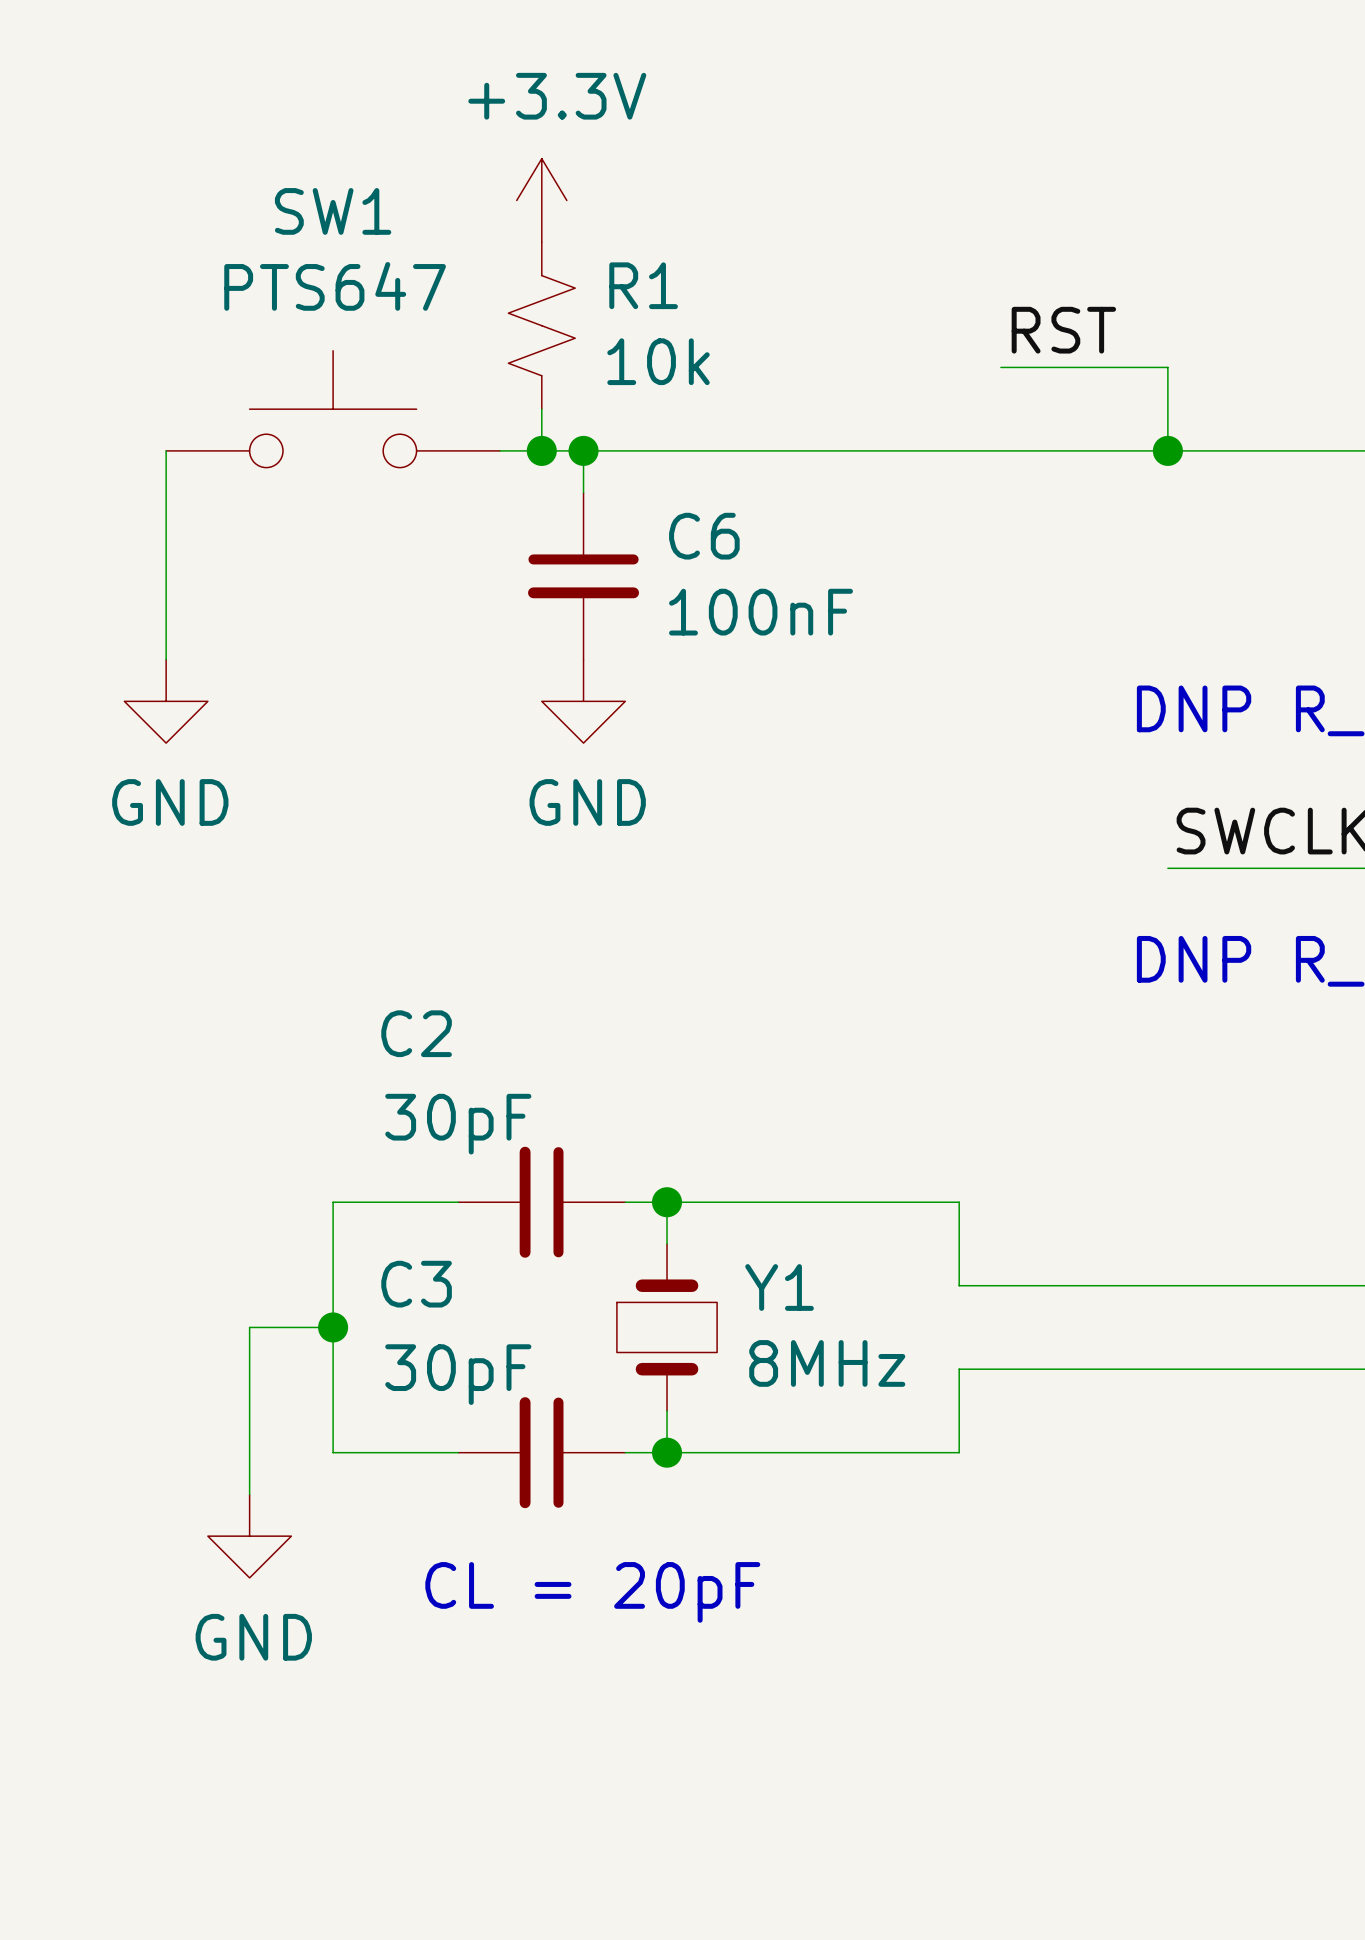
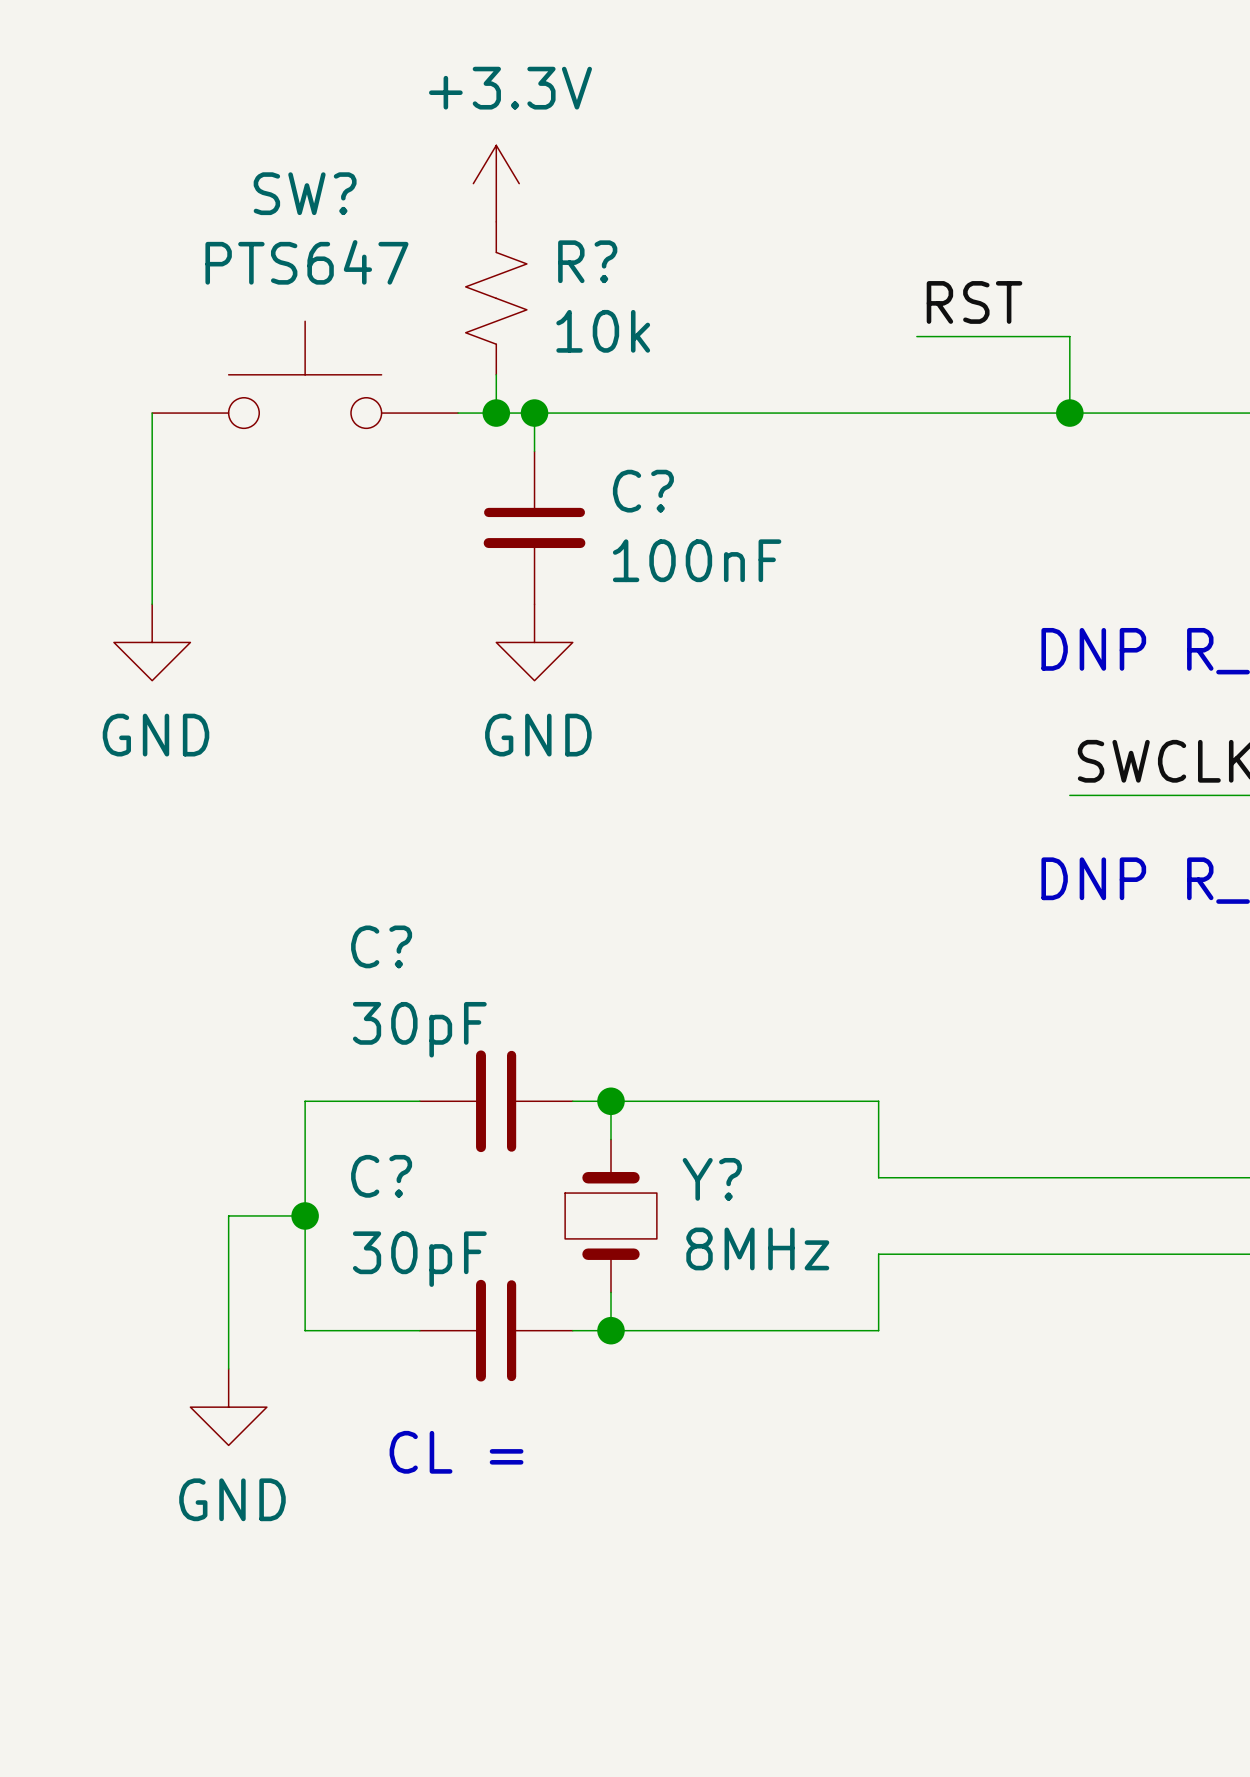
SW1 name: SW1 (333, 211) -> SW? (305, 193)
R1 name: R1 (643, 285) -> R? (587, 261)
C6 name: C6 (704, 536) -> C? (643, 491)
C2 name: C2 (416, 1033) -> C? (381, 946)
C3 name: C3 (416, 1284) -> C? (381, 1176)
Y1 name: Y1 (779, 1287) -> Y? (712, 1179)
text: CL = 20pF (592, 1592) -> CL = (456, 1452)

